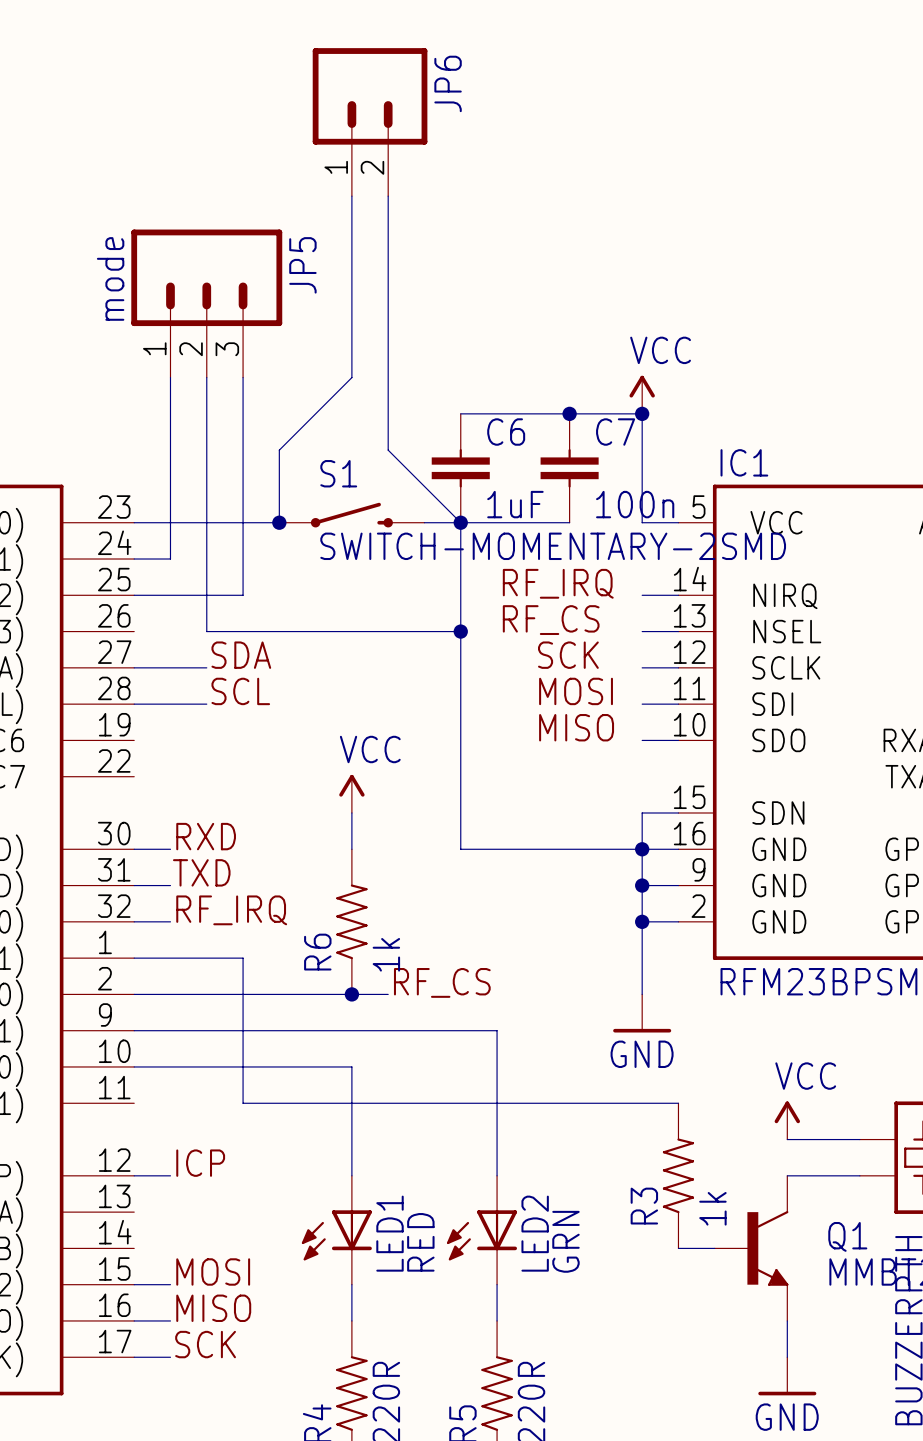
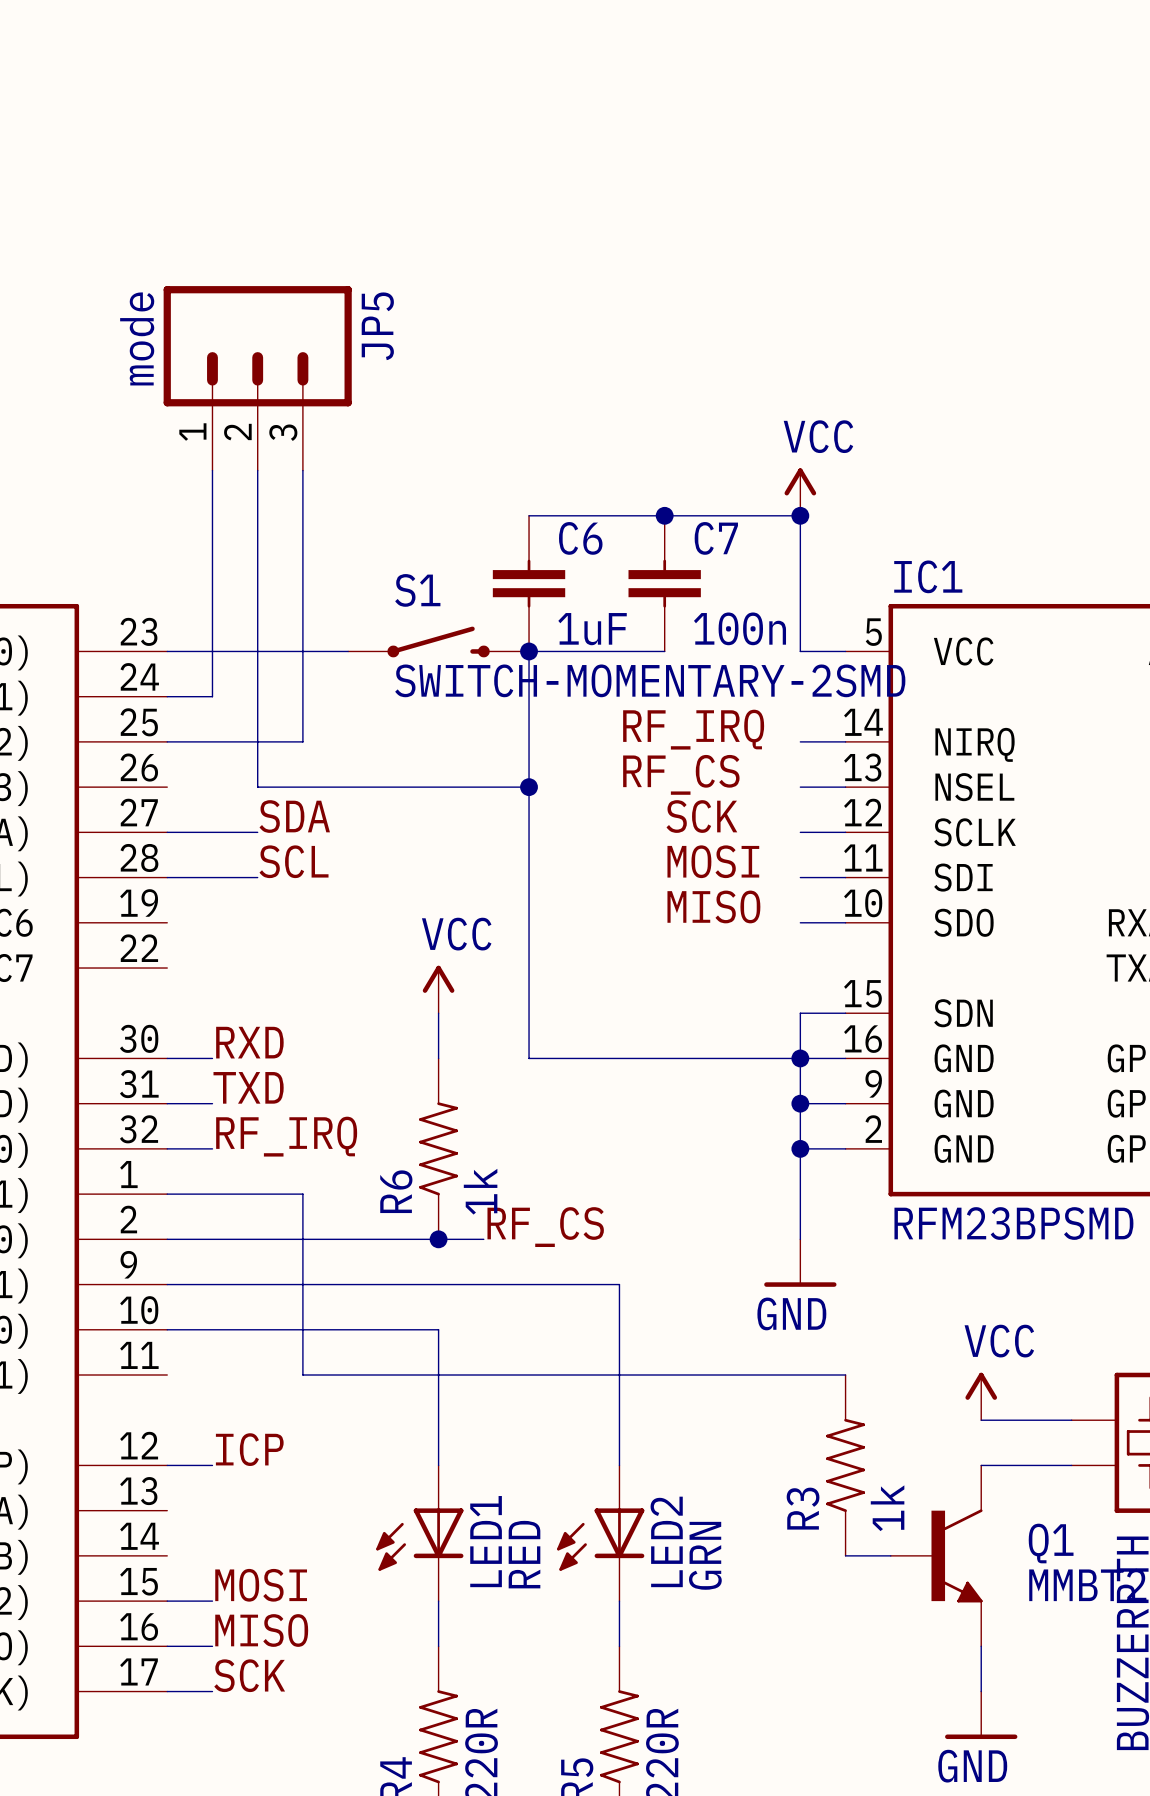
JP6: (370, 122) -> none
wire: (351, 196) (351, 377) (279, 450) (279, 522) -> none
wire: (388, 196) (388, 450) (460, 522) (460, 849) -> (529, 651) (529, 1058) (574, 1058)
junction position: (569, 413) -> (664, 515)
C6 position: (460, 468) -> (529, 583)
C7 position: (569, 468) -> (664, 583)
junction: (279, 522) -> none
junction position: (460, 522) -> (529, 651)
wire: (533, 522) (569, 522) -> (529, 515) (574, 515)
wire: (424, 631) (460, 631) -> none
junction position: (460, 631) -> (529, 787)

